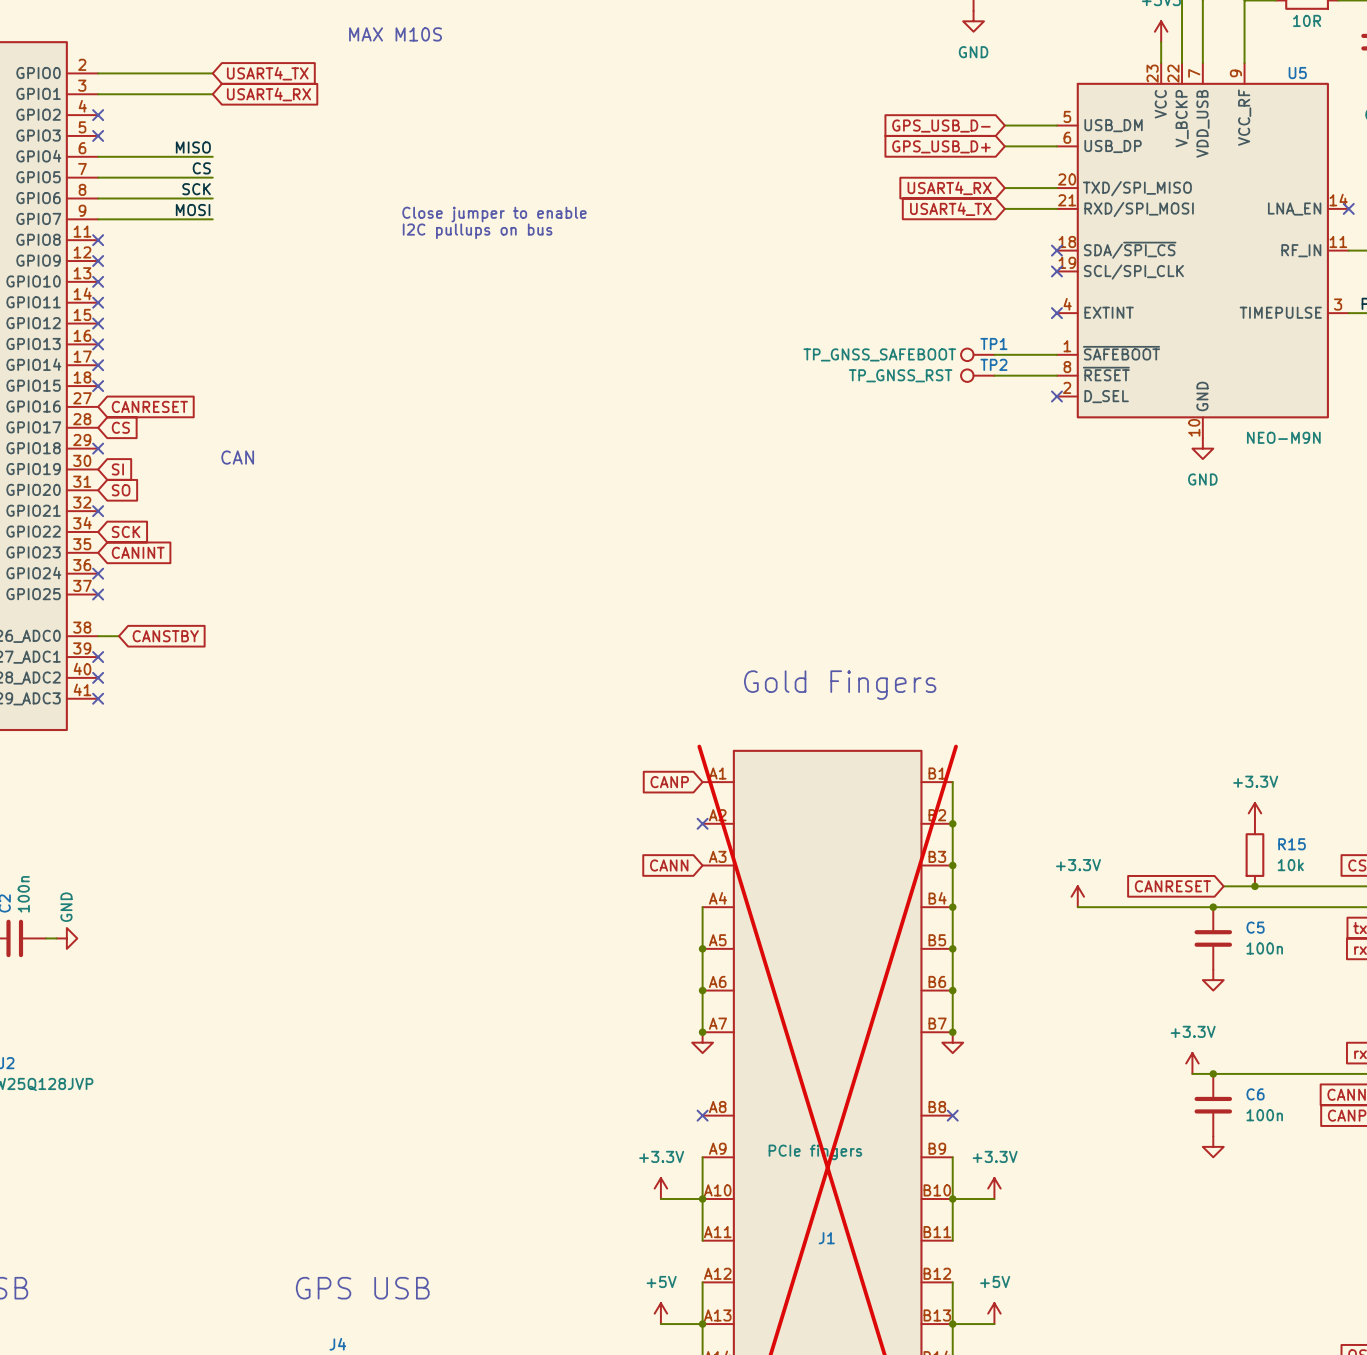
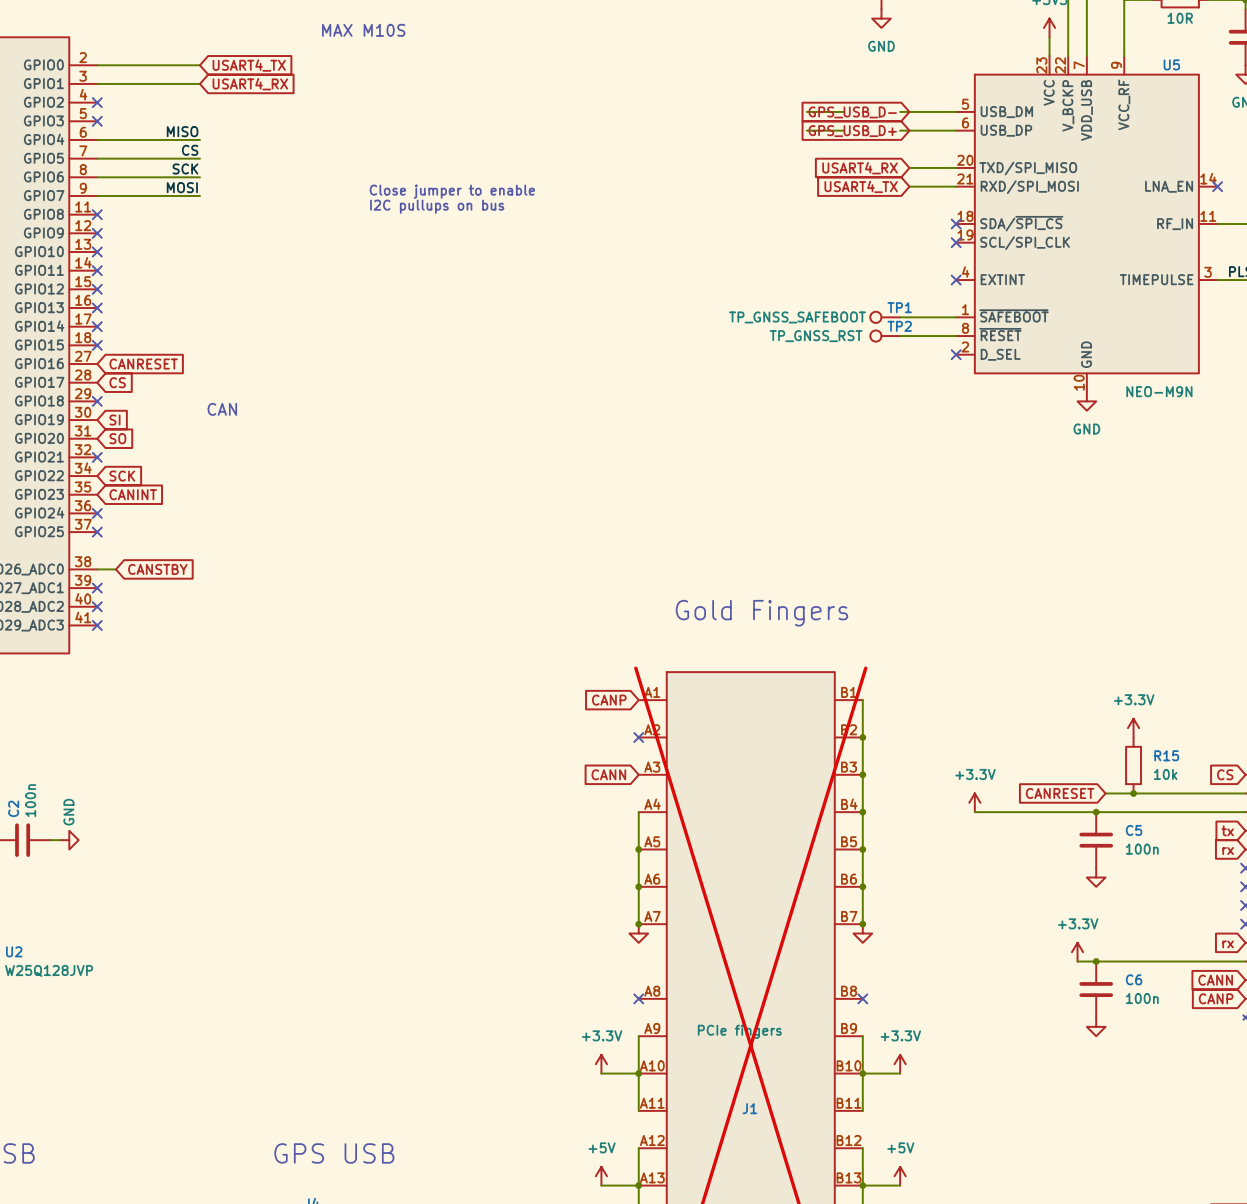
wire: none -> (806, 111) (844, 111)
wire: none -> (900, 111) (909, 111)
wire: none -> (806, 130) (844, 130)
wire: none -> (900, 130) (909, 130)

